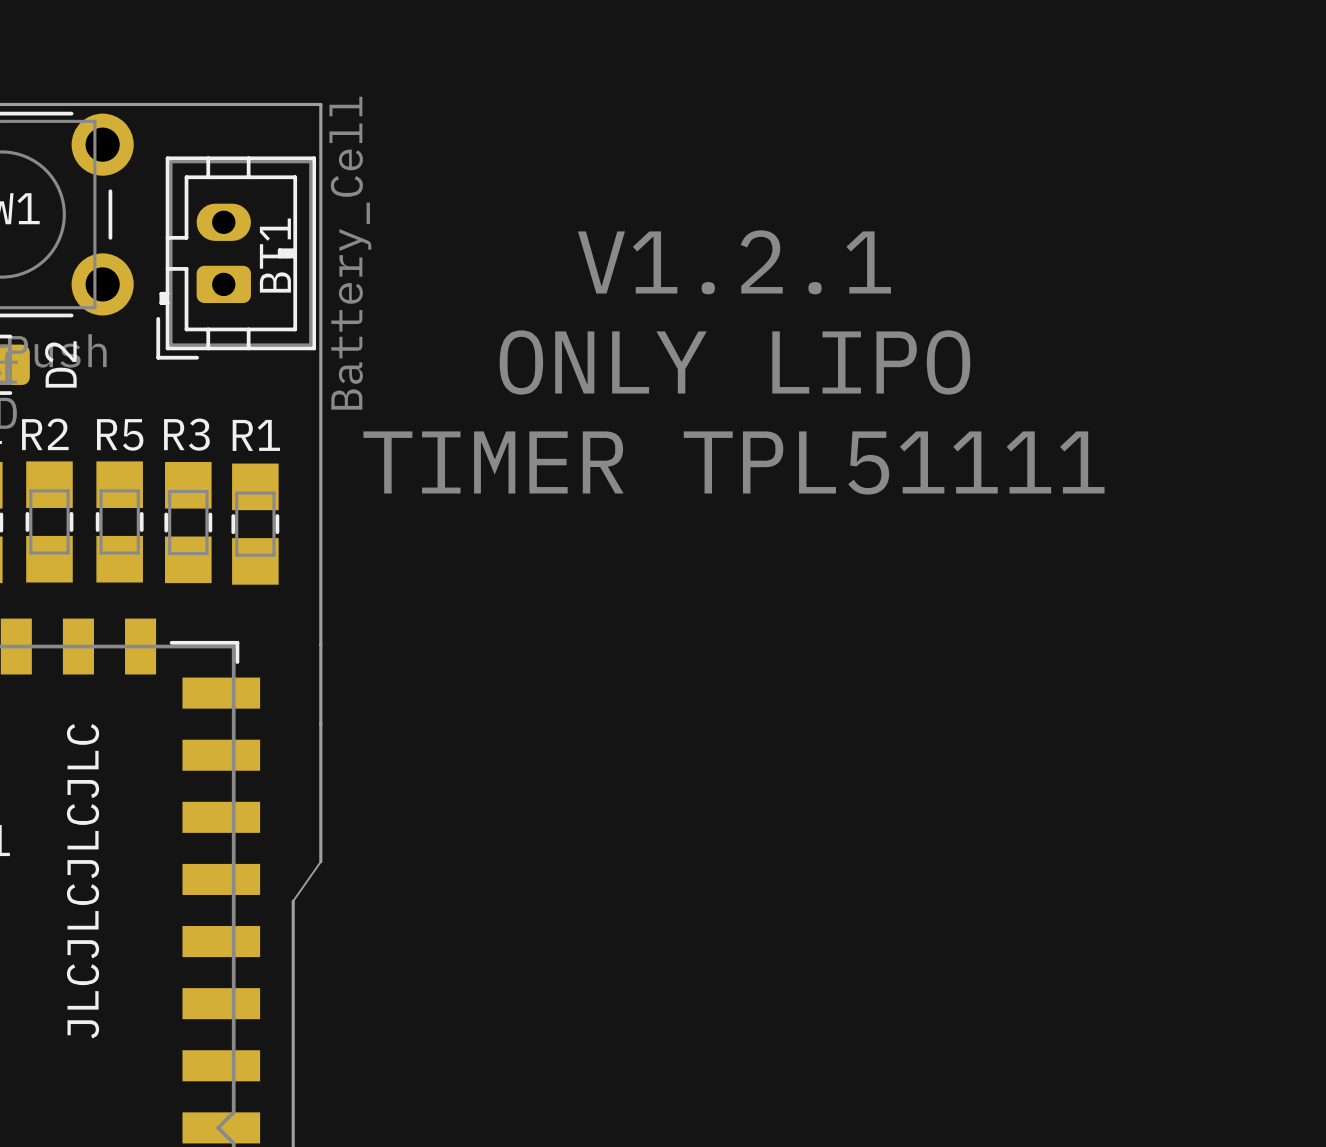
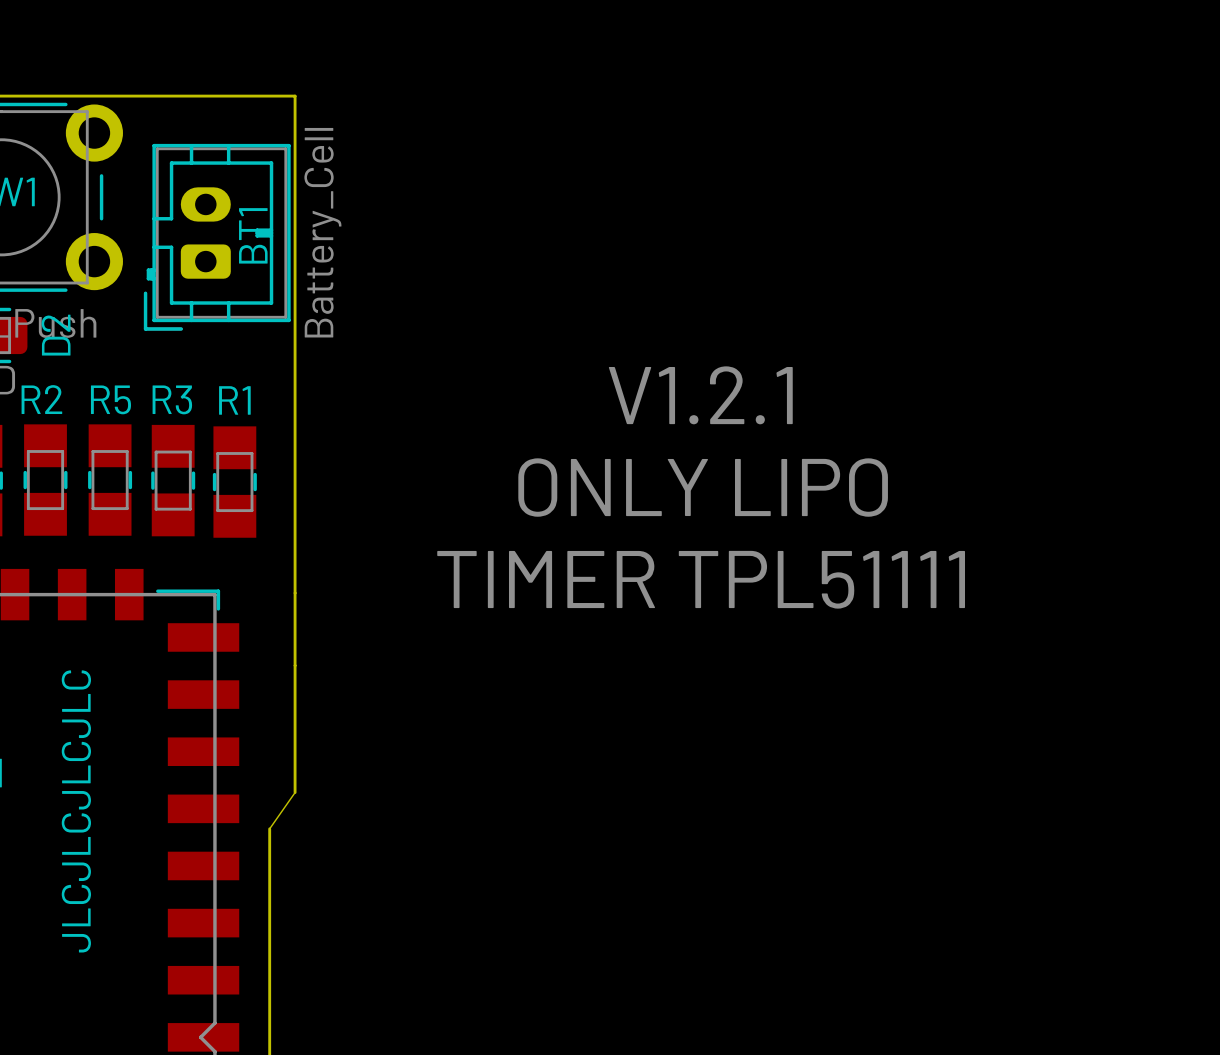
text position: V1.2.1 (734, 262) -> V1.2.1 (700, 395)
text position: ONLY LIPO (734, 362) -> ONLY LIPO (703, 487)
text position: TIMER TPL51111 (733, 463) -> TIMER TPL51111 (701, 579)

